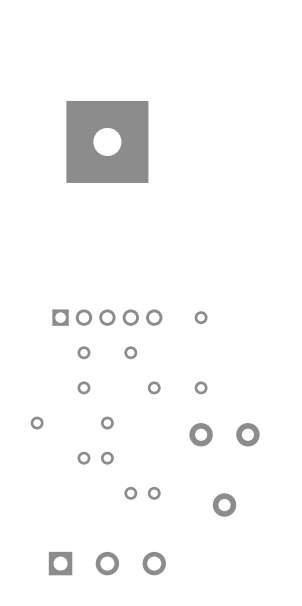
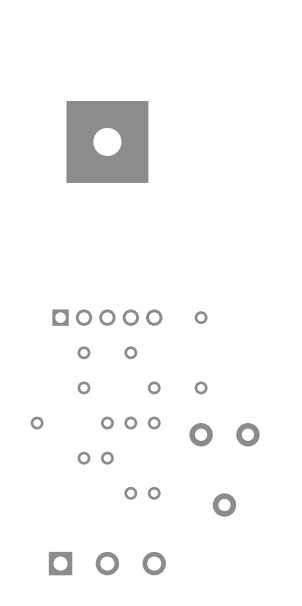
part: none -> (142, 423)

